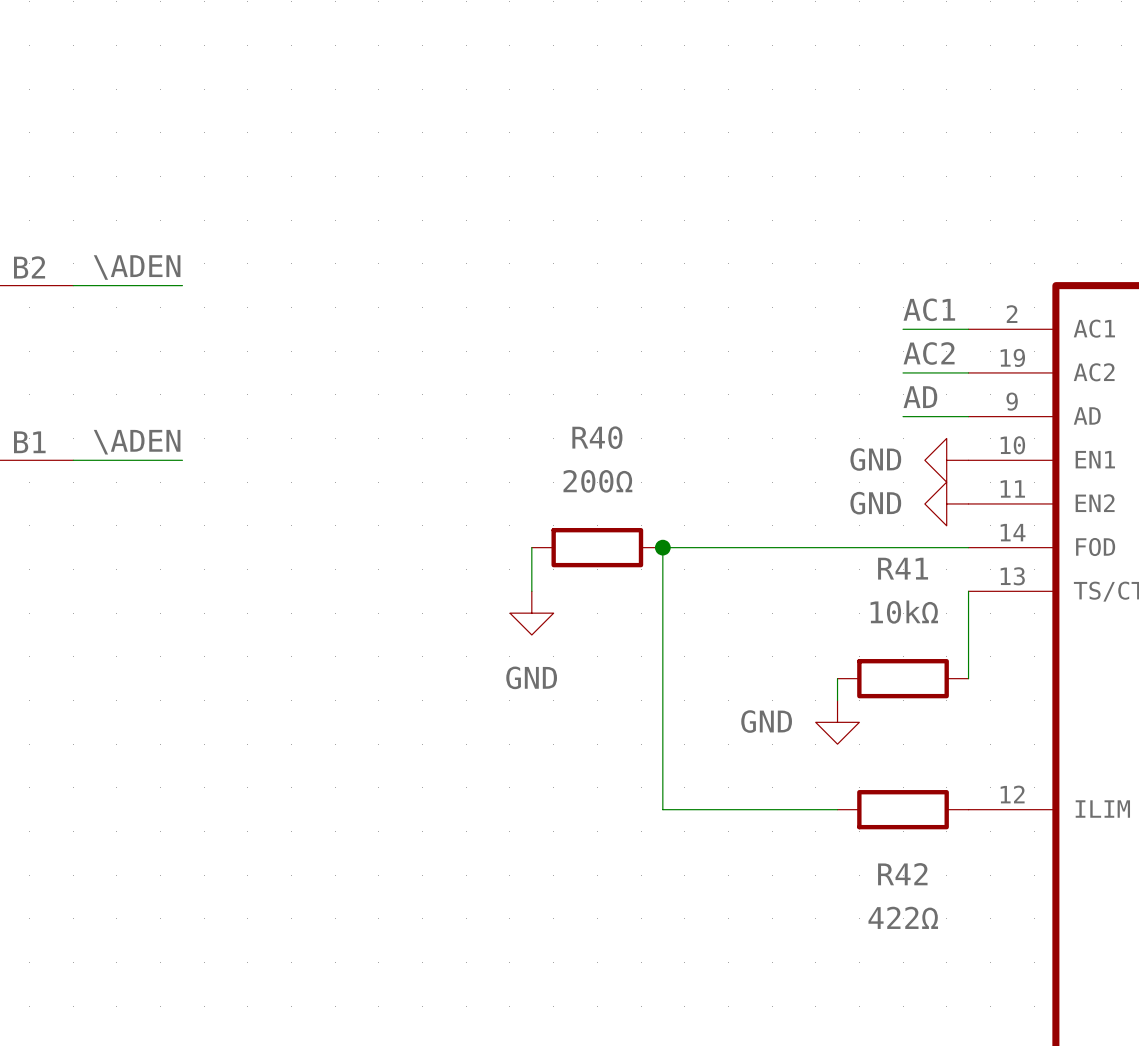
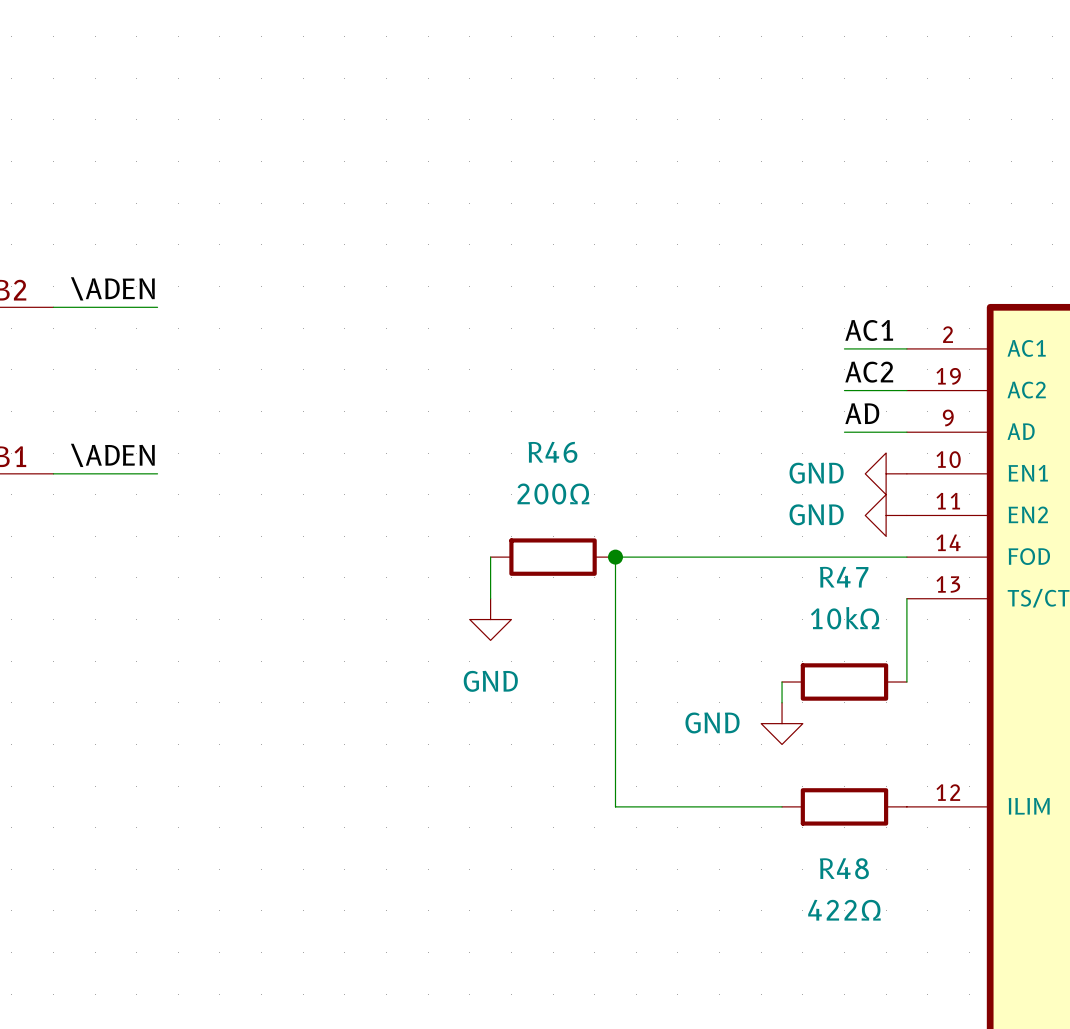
R40 name: R40 (597, 437) -> R46 (552, 452)
R41 name: R41 (903, 568) -> R47 (844, 577)
R42 name: R42 (902, 874) -> R48 (844, 868)

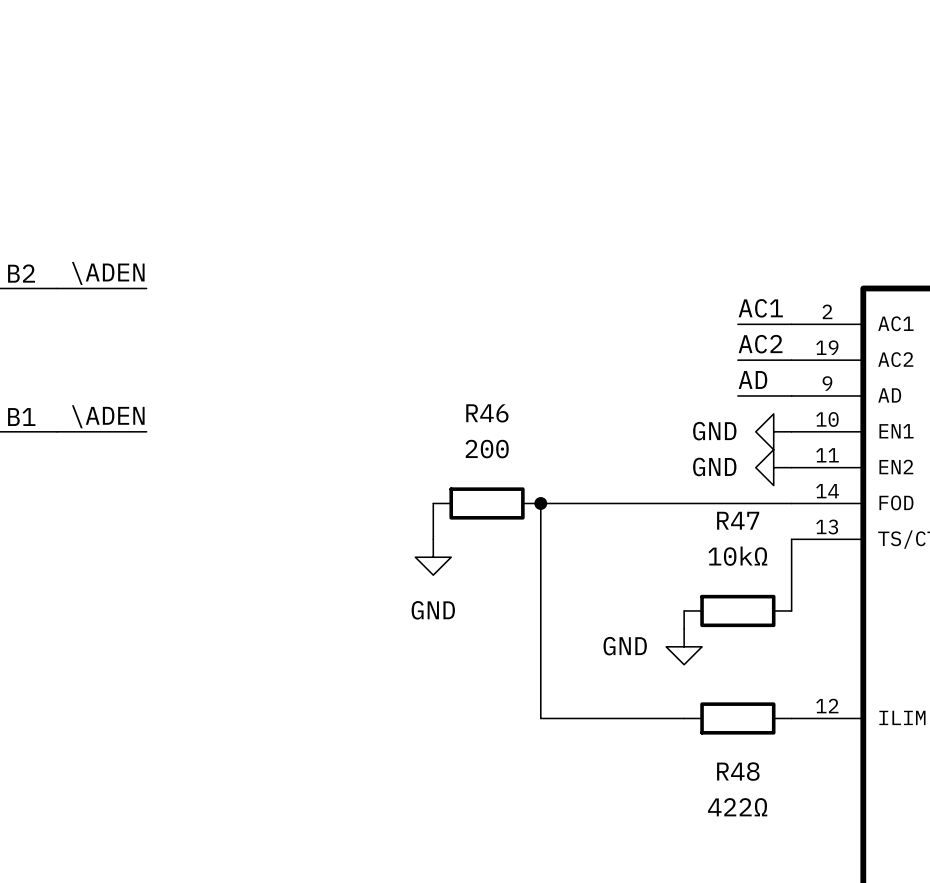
R46 value: 200Ω (553, 494) -> 200 (487, 449)

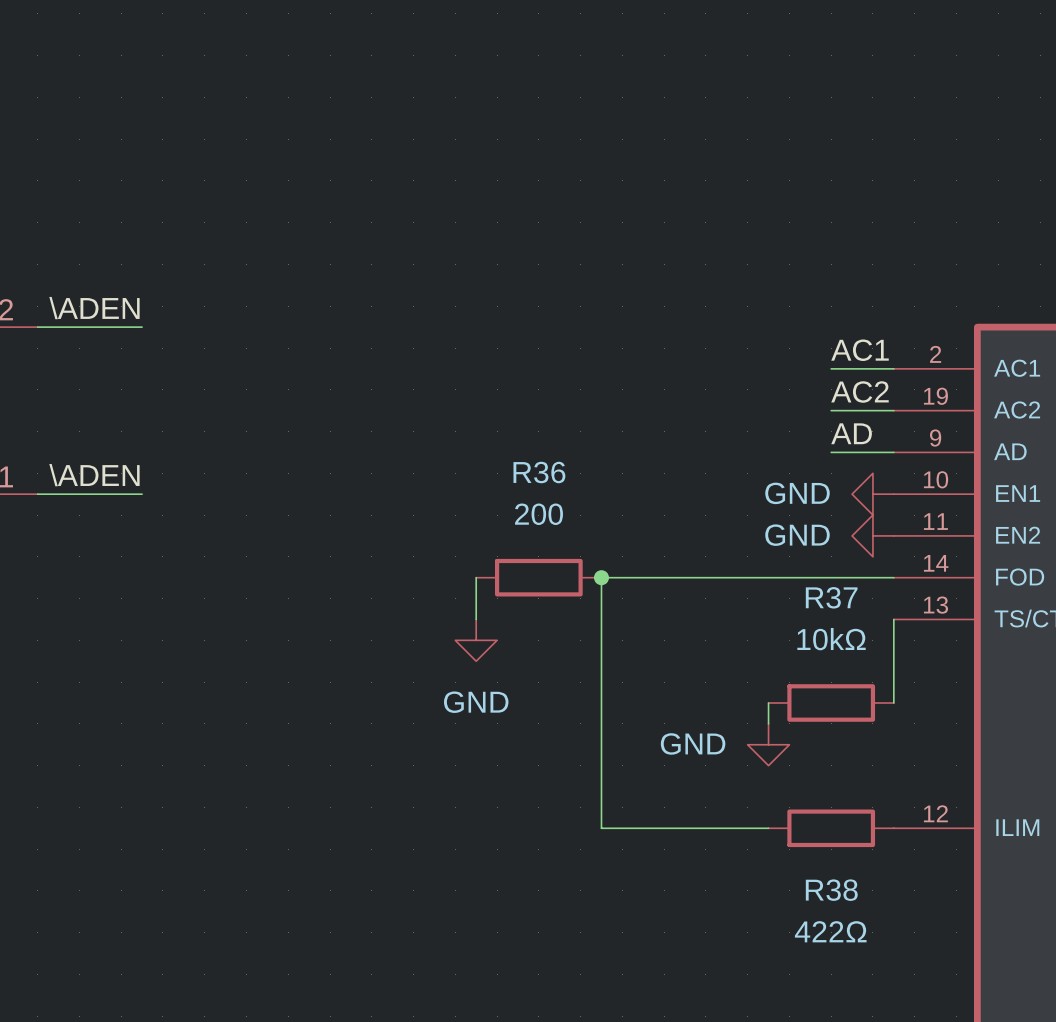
R46 name: R46 (487, 413) -> R36 (539, 472)
R47 name: R47 (738, 520) -> R37 (831, 597)
R48 name: R48 (738, 771) -> R38 (831, 890)

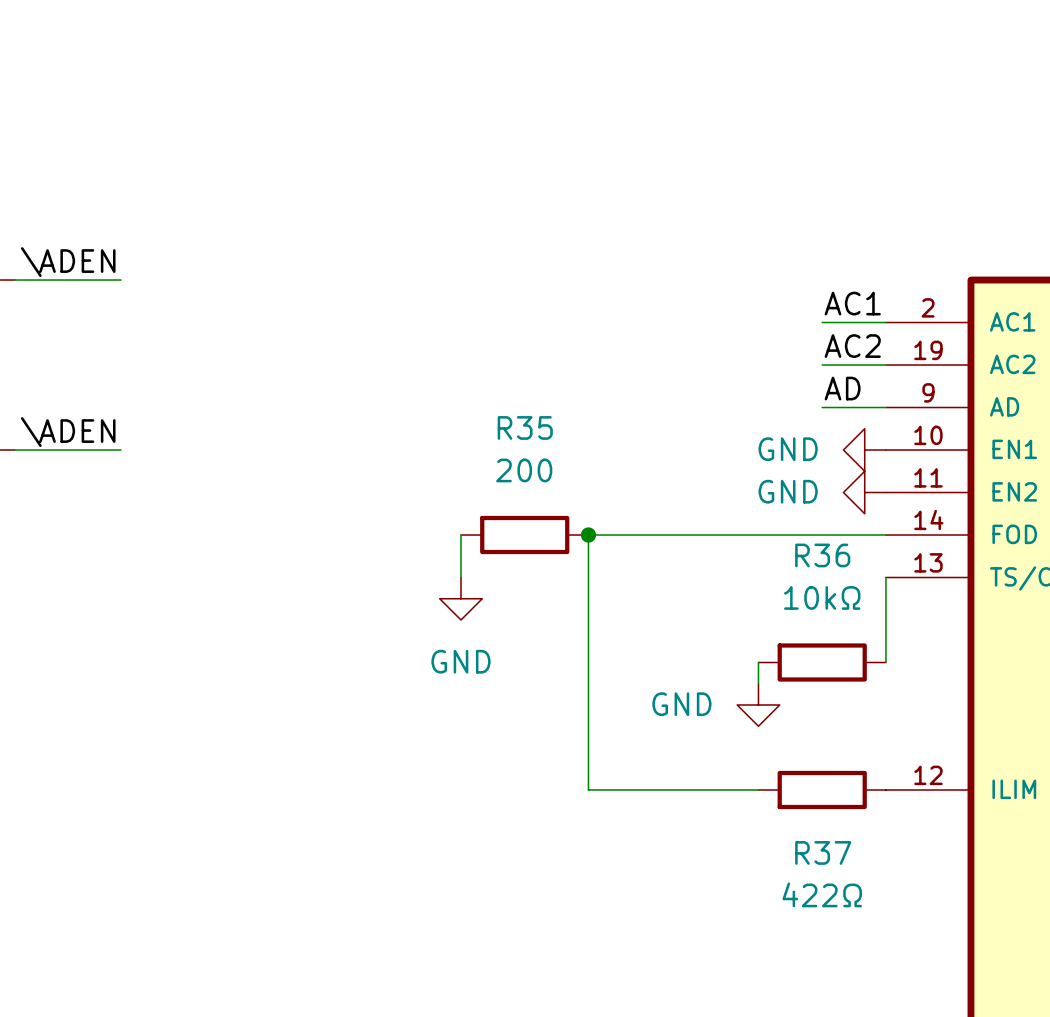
R36 name: R36 (539, 472) -> R35 (525, 427)
R37 name: R37 (831, 597) -> R36 (822, 555)
R38 name: R38 (831, 890) -> R37 (823, 852)

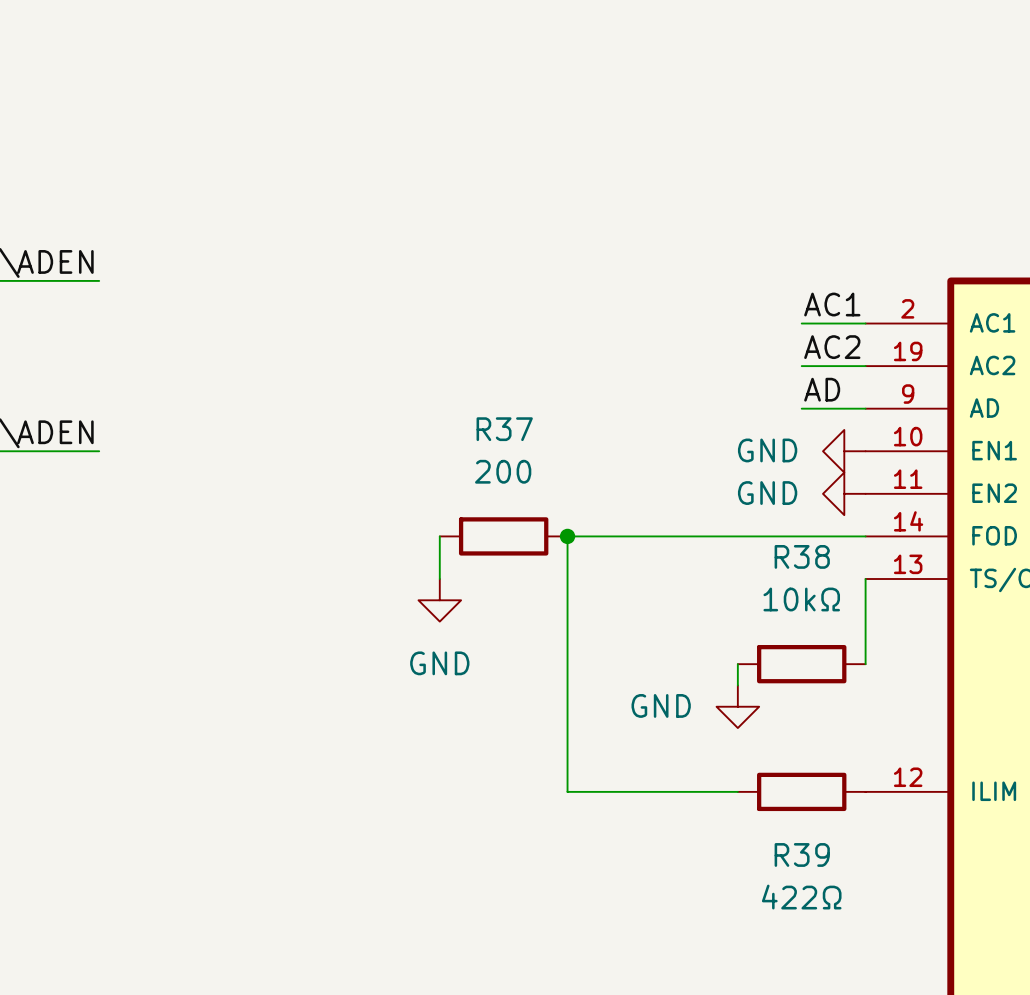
R35 name: R35 (525, 427) -> R37 (504, 429)
R36 name: R36 (822, 555) -> R38 (802, 556)
R37 name: R37 (823, 852) -> R39 (802, 854)

